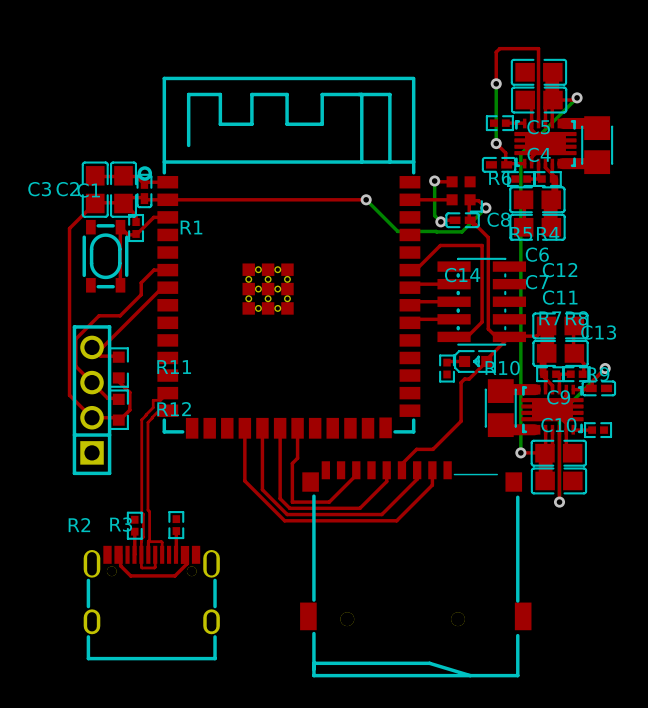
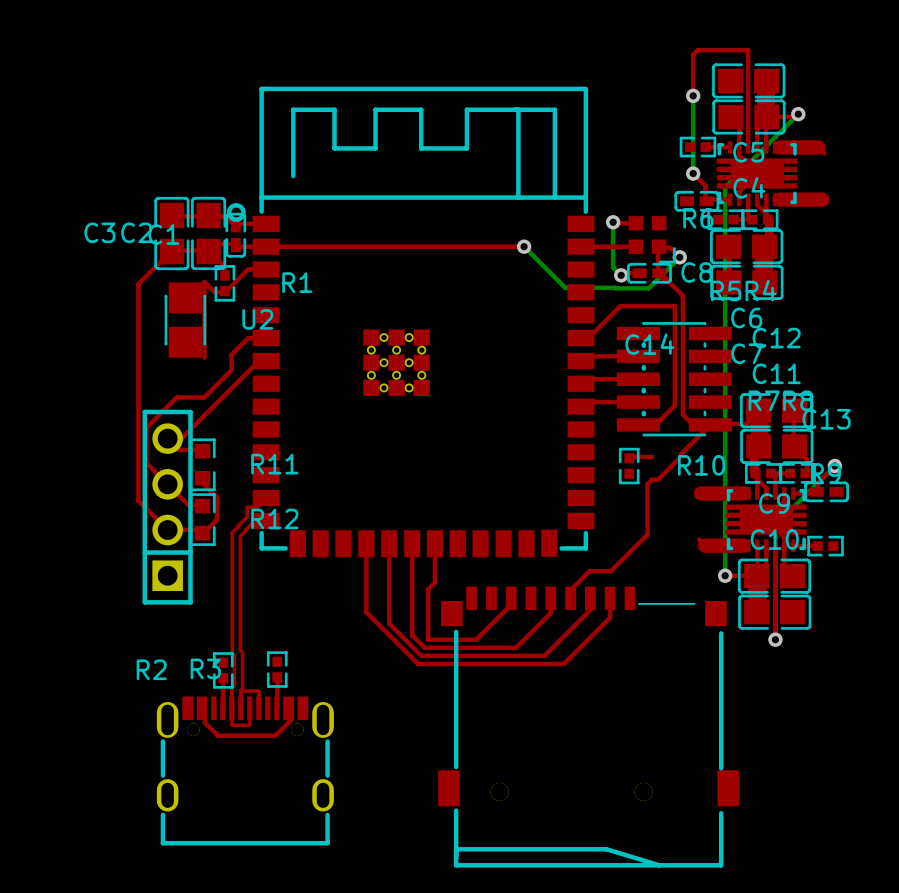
part: (597, 145) -> none
part: (105, 256) -> none
U2: none -> (185, 320)
part: (474, 361) -> none
part: (500, 408) -> none

